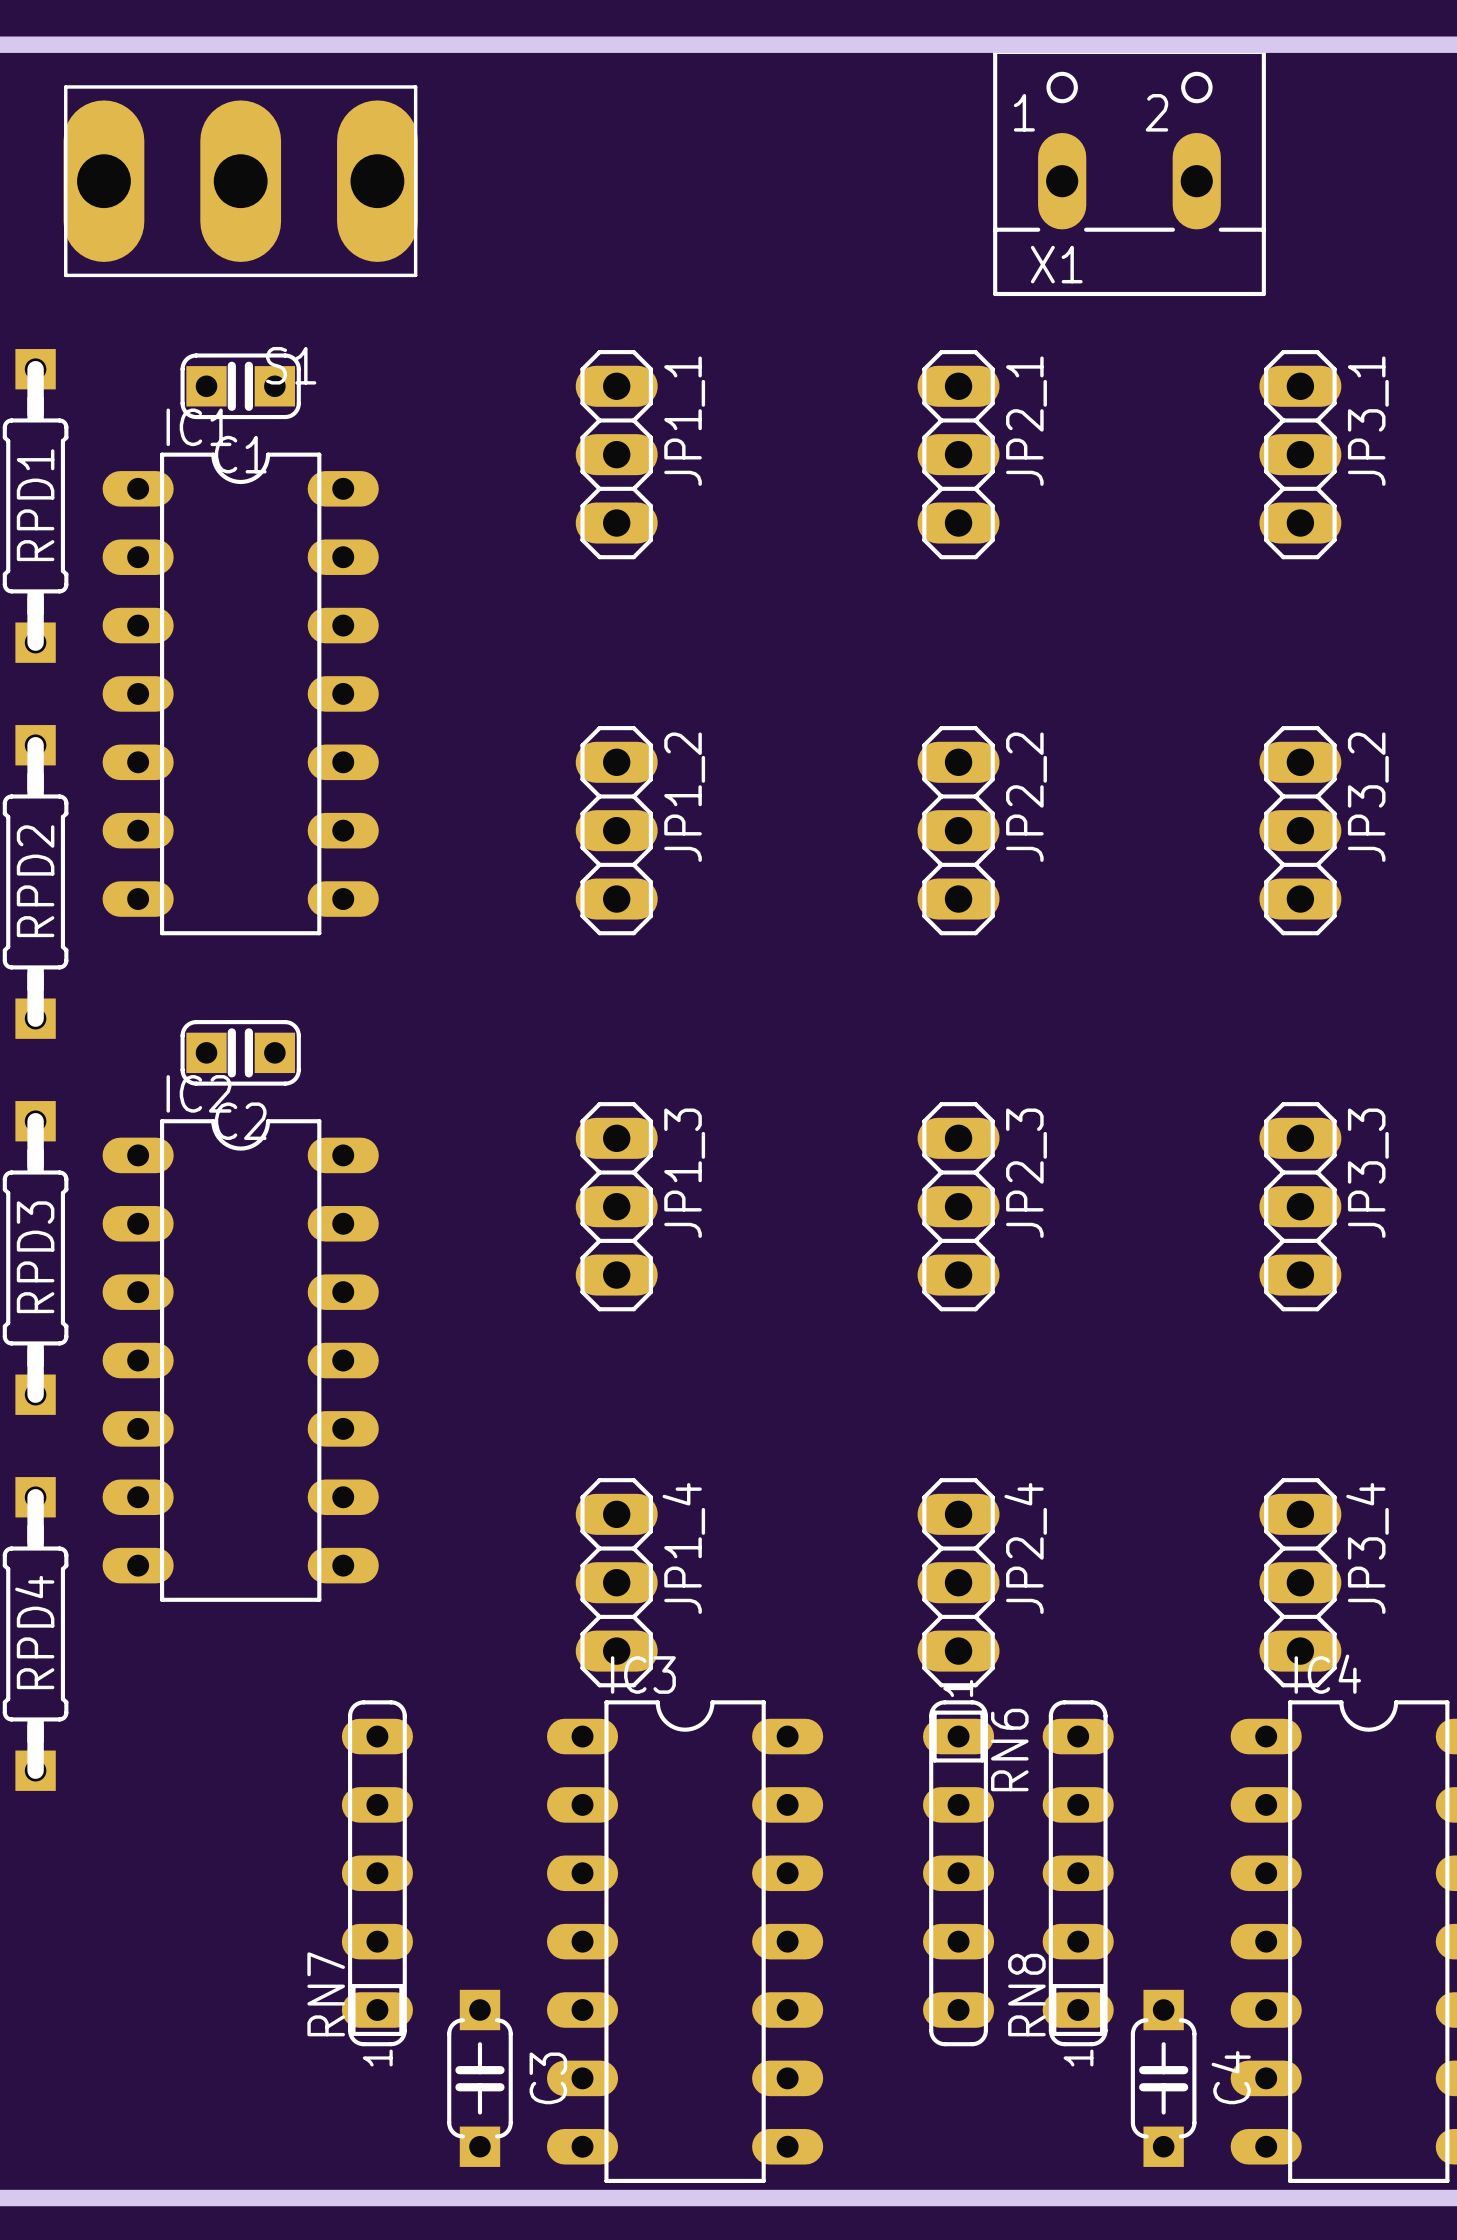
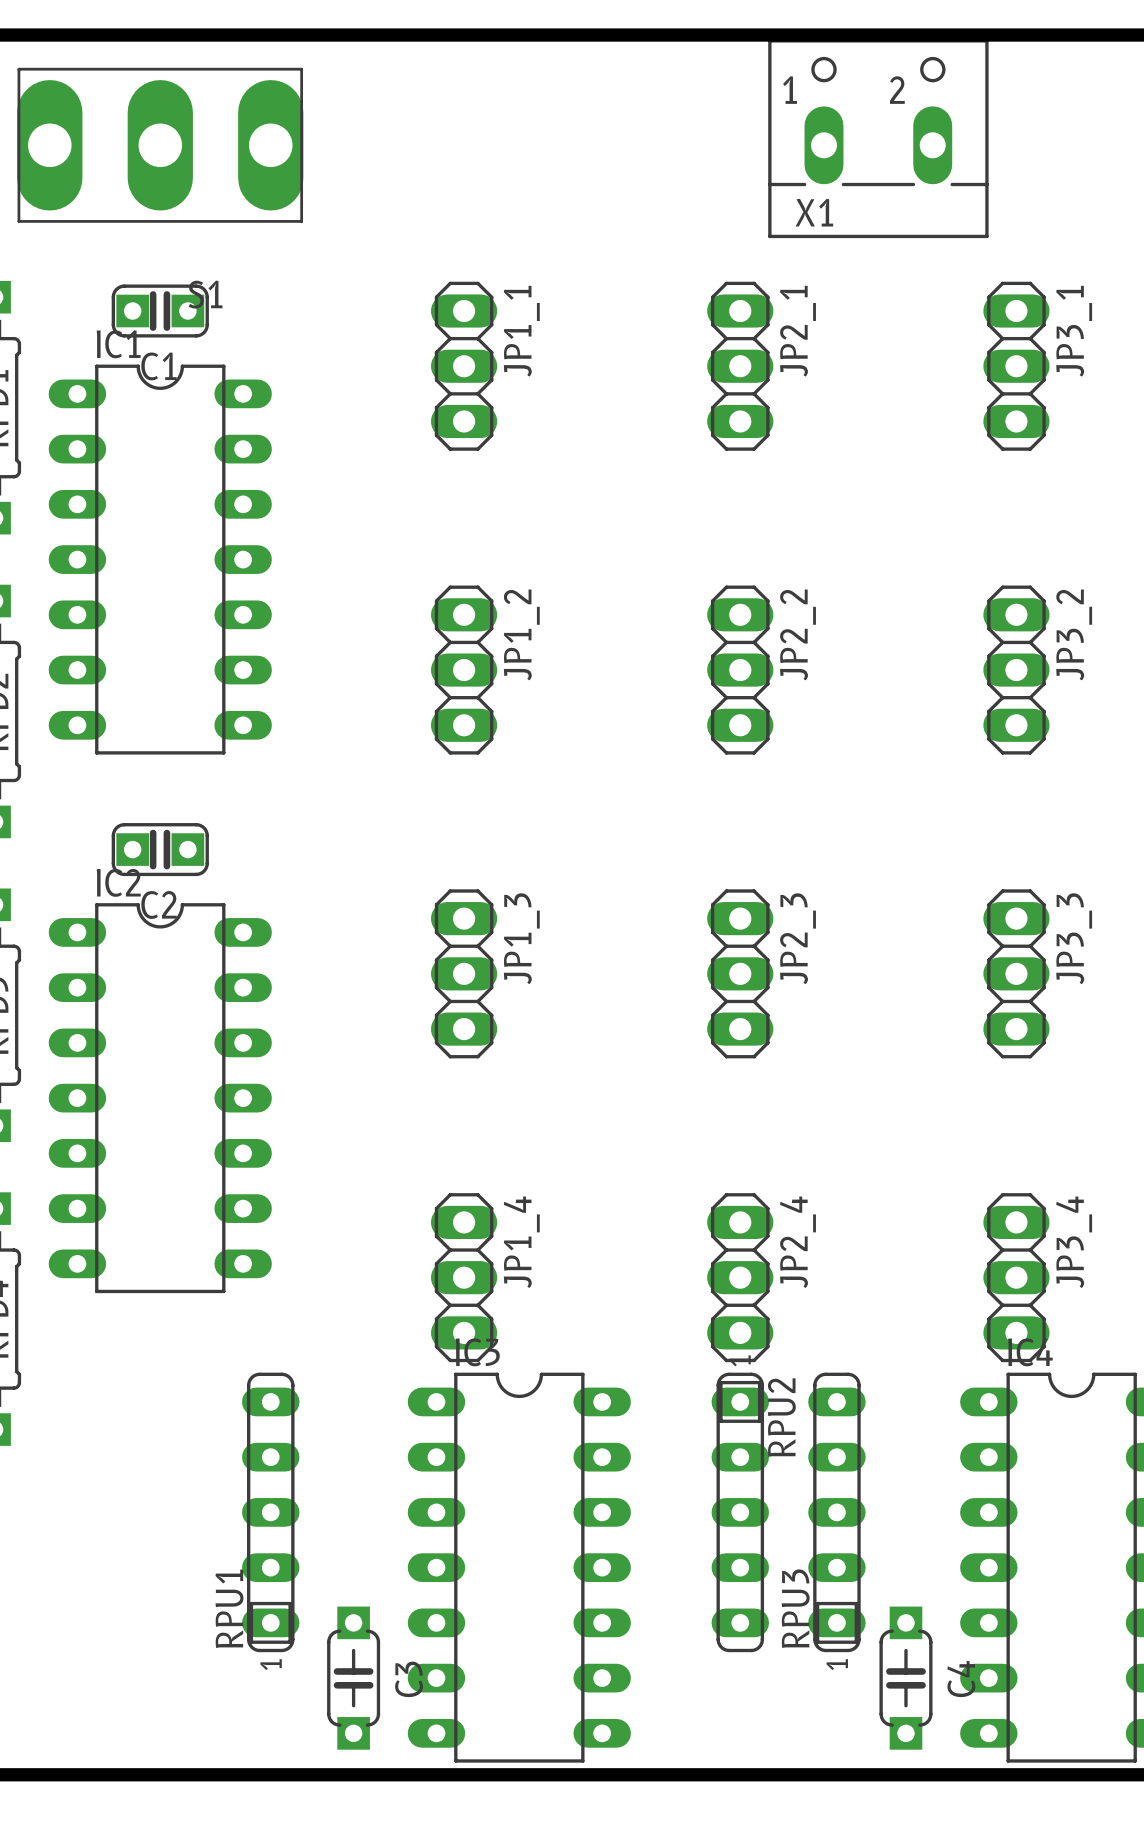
RN6 name: RN6 (1009, 1750) -> RPU2 (781, 1417)
RN7 name: RN7 (326, 1994) -> RPU1 (229, 1608)
RN8 name: RN8 (1026, 1995) -> RPU3 (795, 1608)

